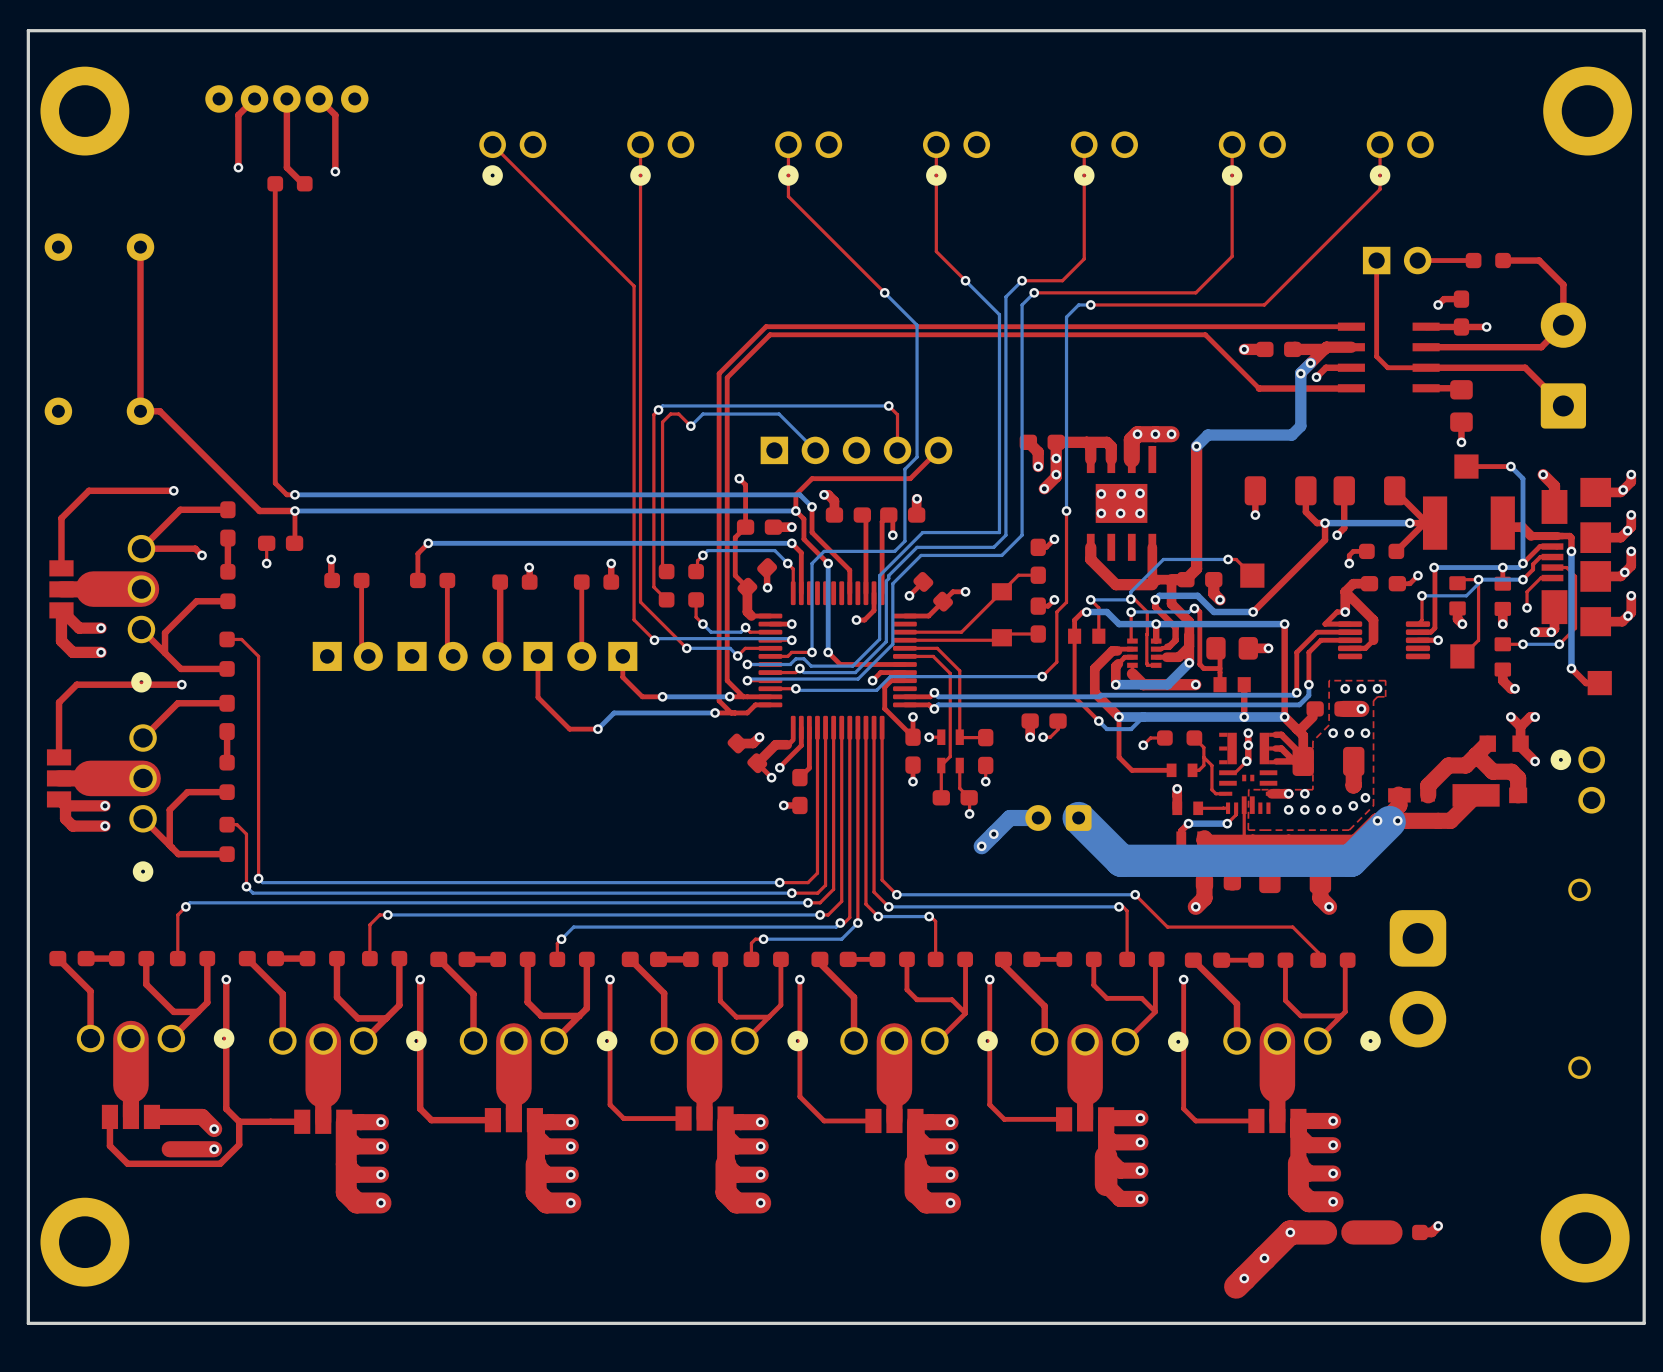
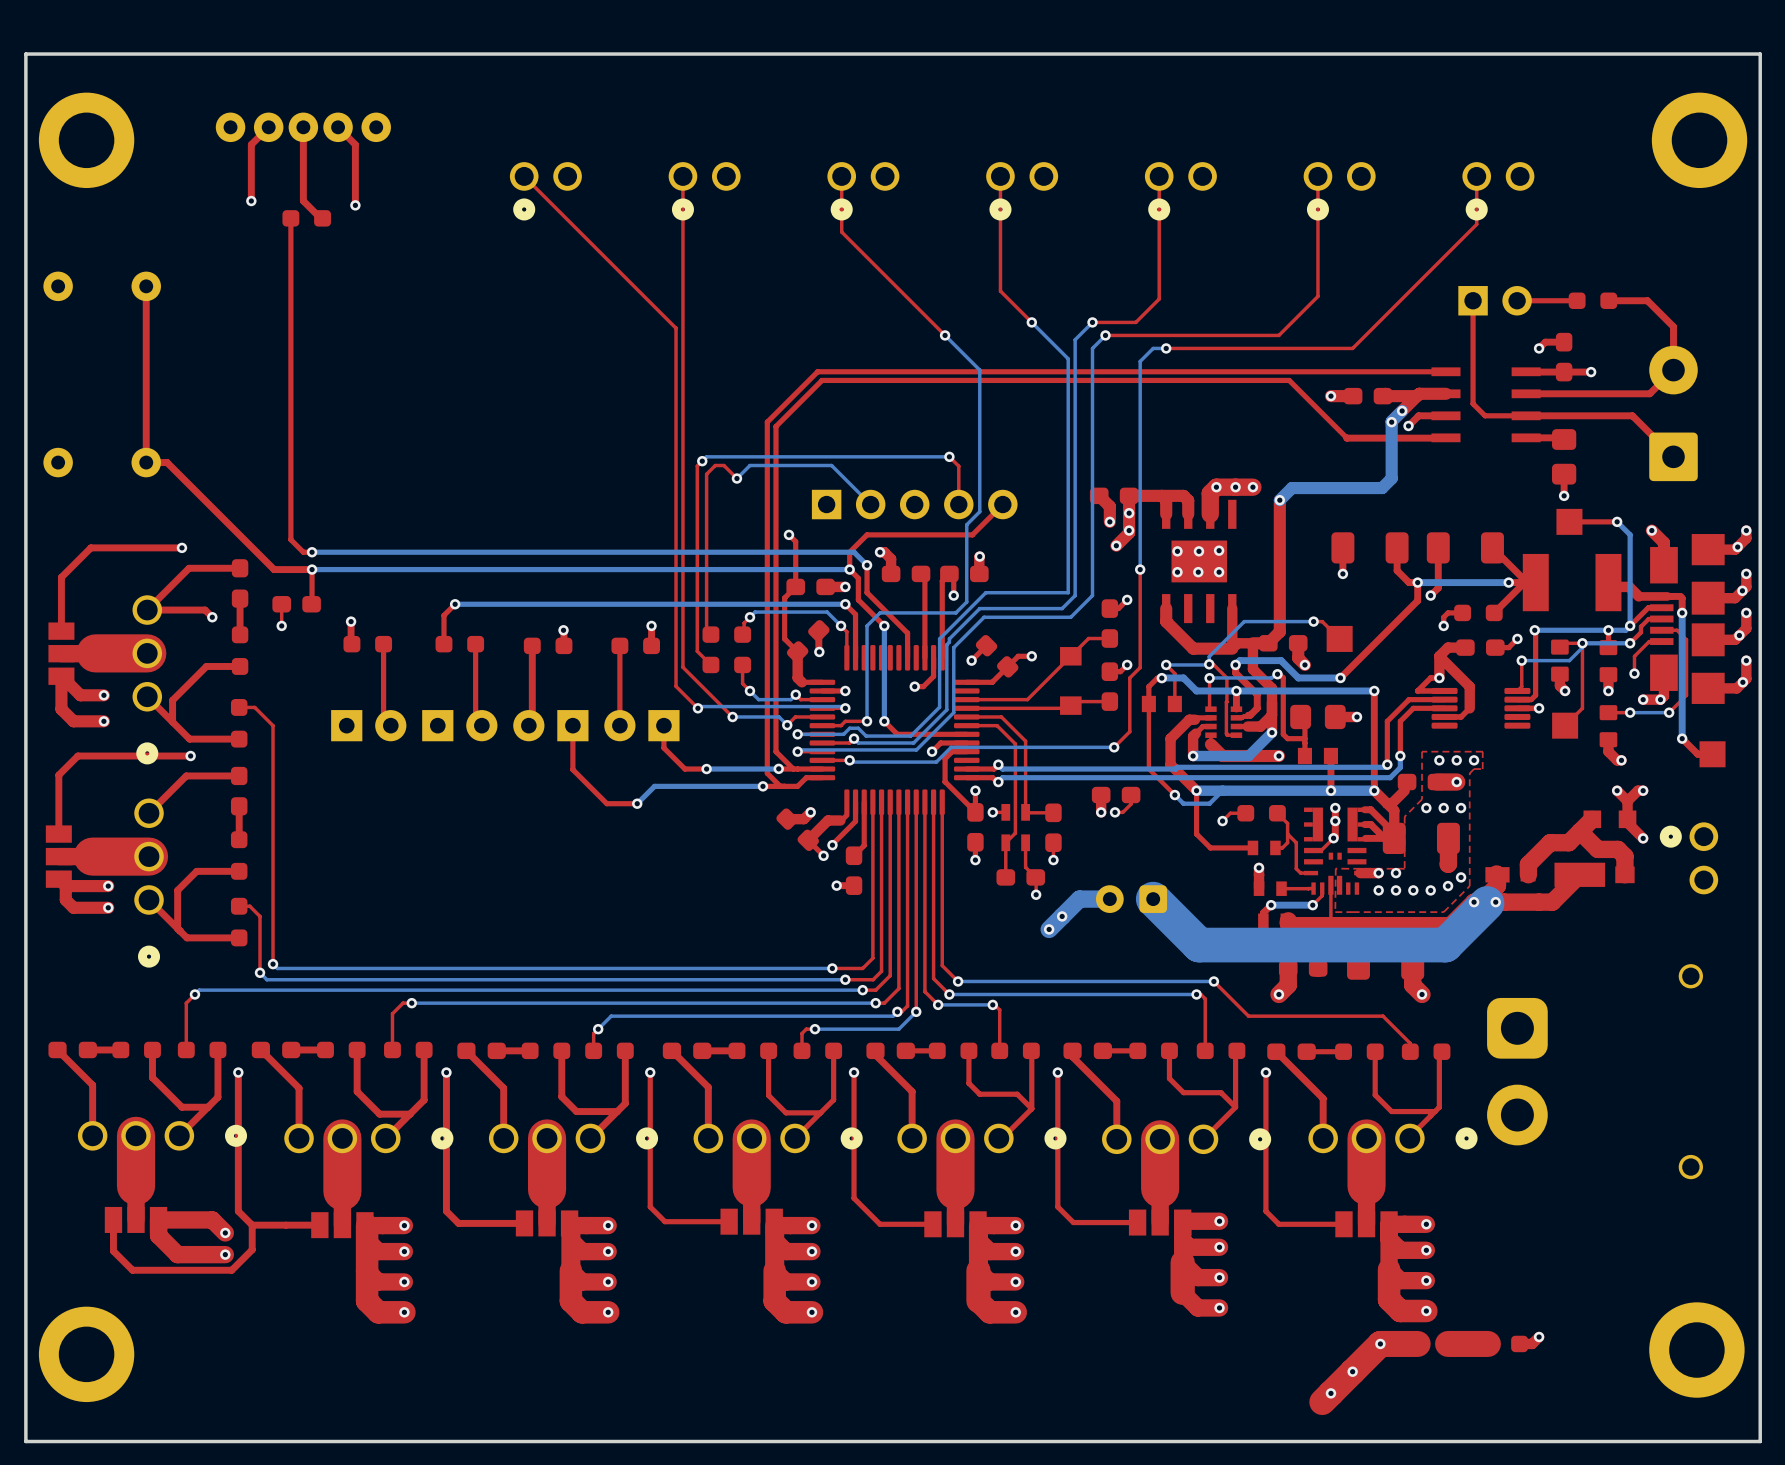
top track: none -> (158, 1219) (158, 1235) (177, 1254)

